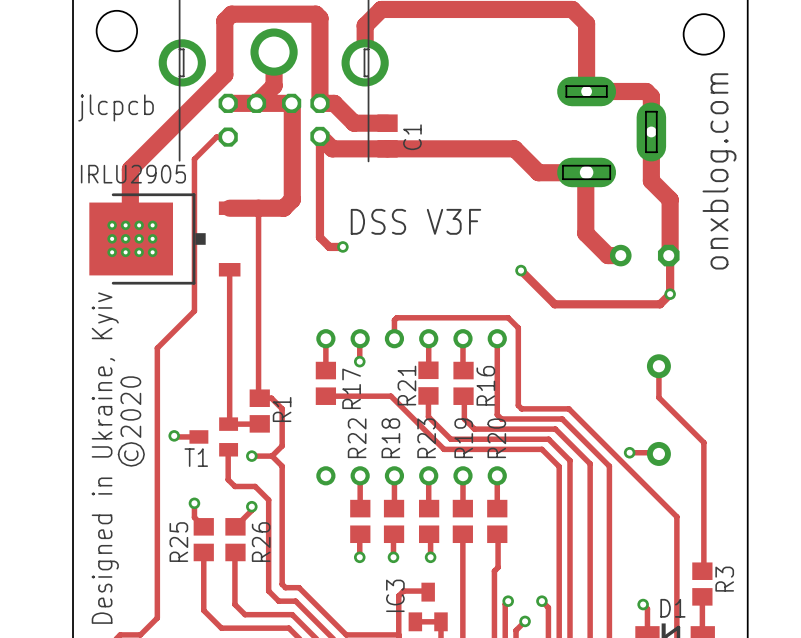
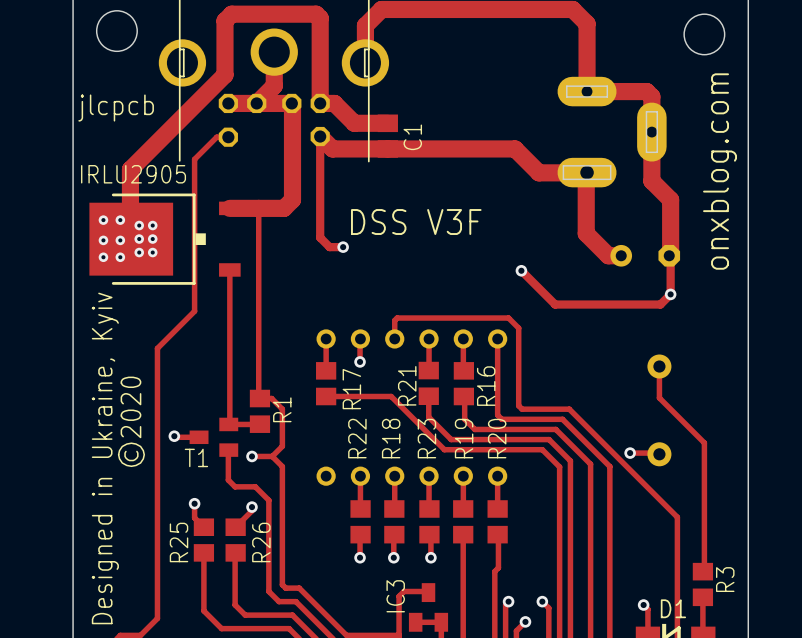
via: none -> (103, 220)
via: none -> (120, 220)
via: (112, 225) -> none
via: (125, 225) -> none
via: (112, 238) -> none
via: (125, 238) -> none
via: none -> (103, 240)
via: none -> (120, 240)
via: (112, 252) -> none
via: (125, 252) -> none
via: none -> (103, 257)
via: none -> (120, 257)

